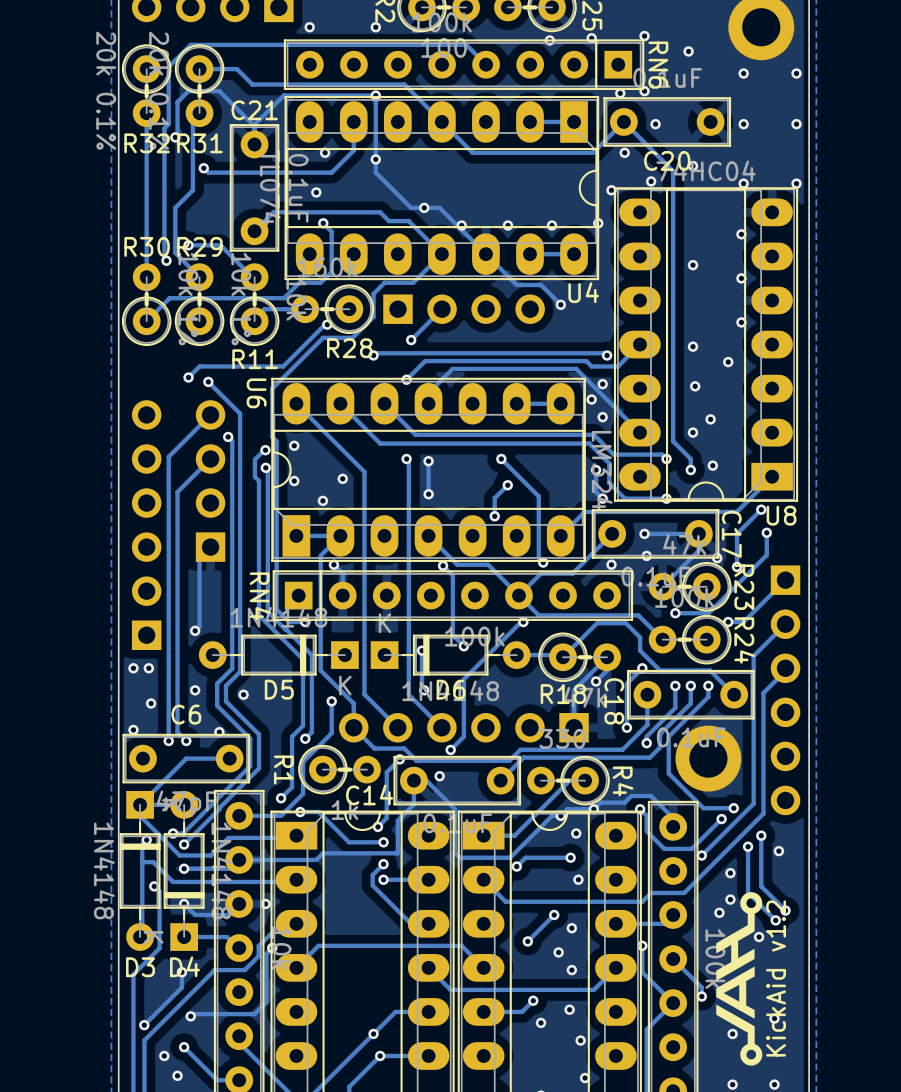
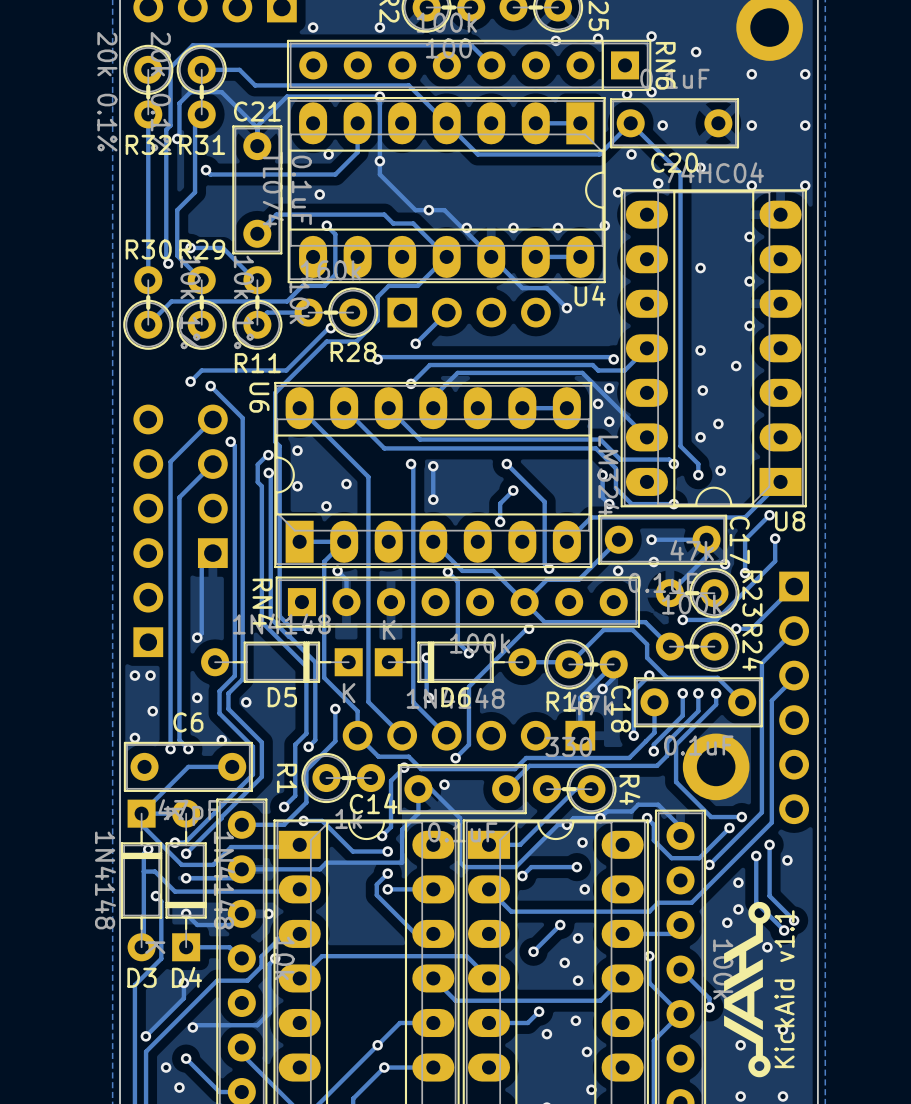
text: KickAid v1.2 (776, 978) -> KickAid v1.1 (784, 989)

